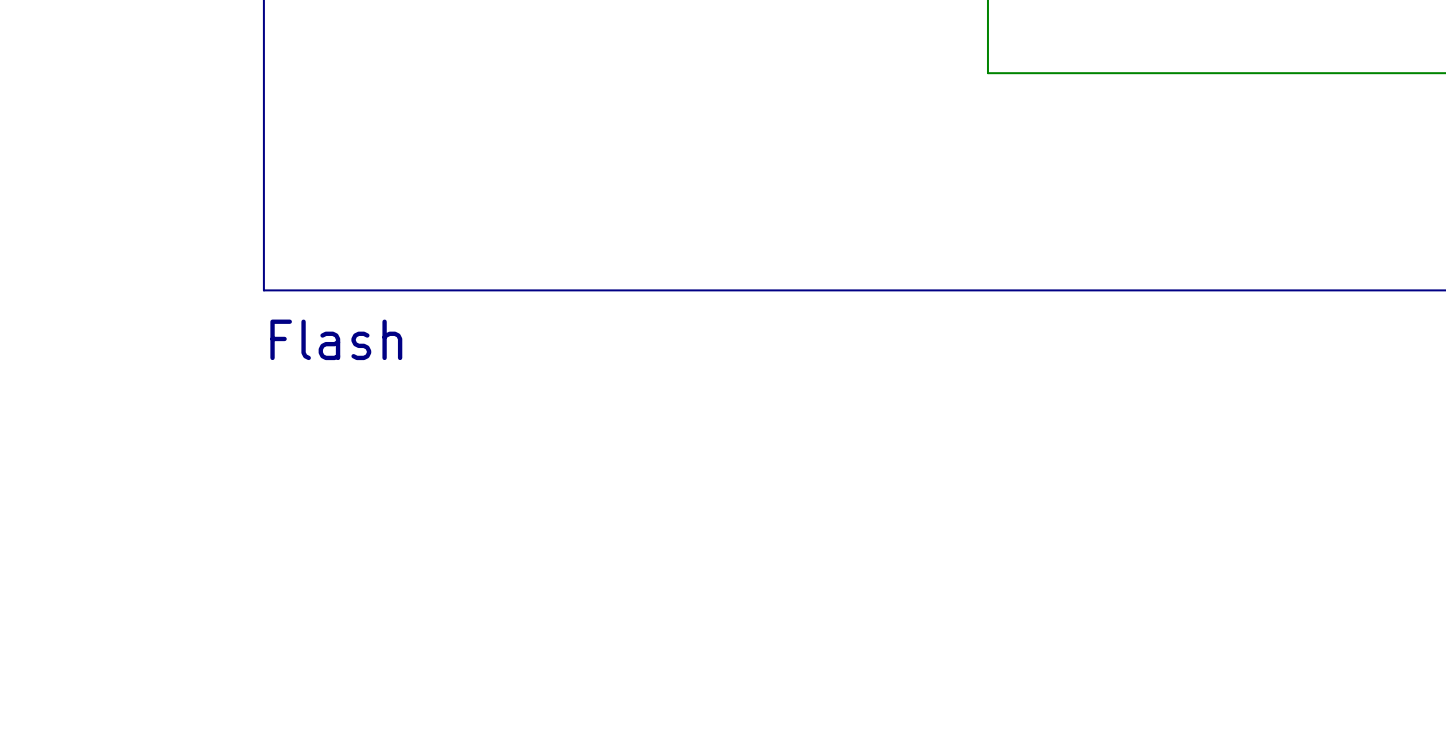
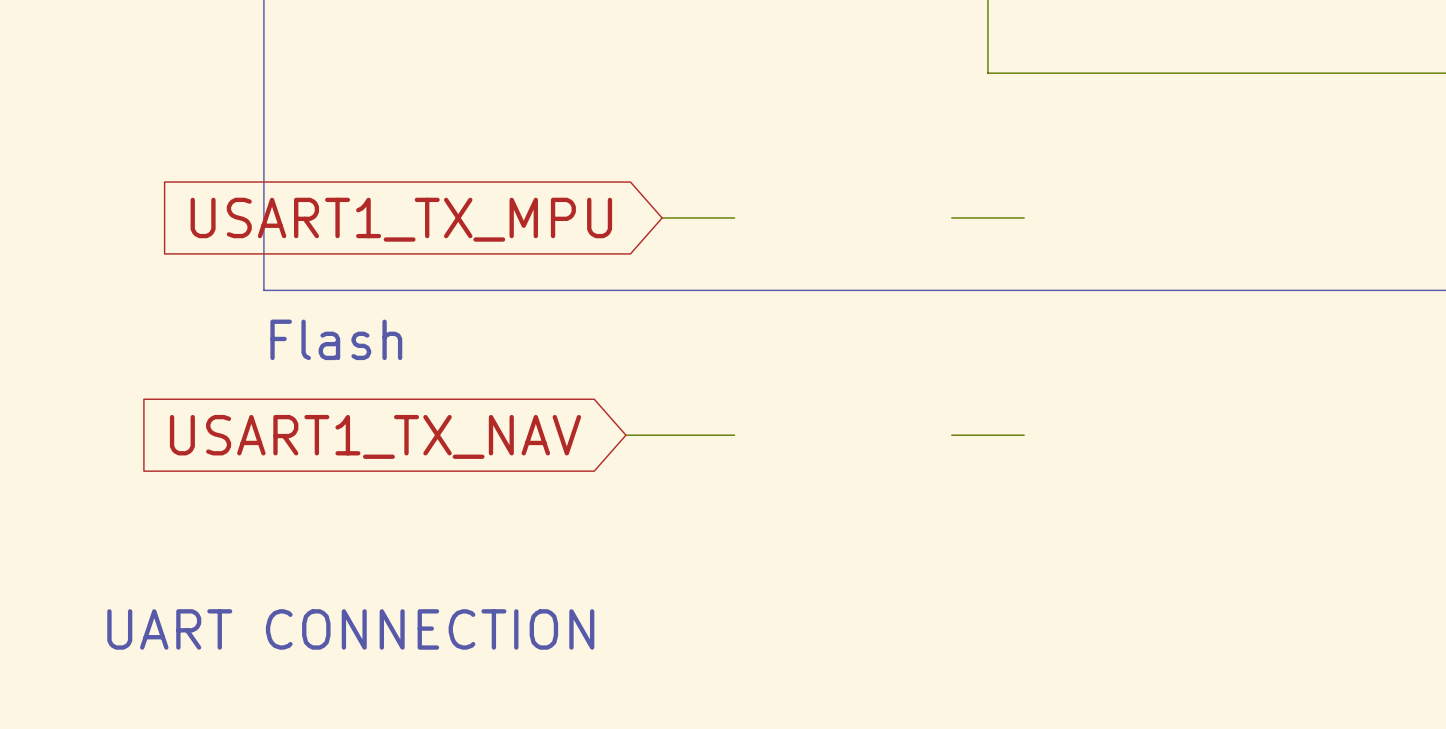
wire: none -> (662, 217) (734, 217)
wire: none -> (951, 217) (1024, 217)
global label: none -> USART1_TX_MPU (401, 219)
wire: none -> (625, 435) (734, 435)
wire: none -> (951, 435) (1024, 435)
global label: none -> USART1_TX_NAV (375, 436)
text: none -> UART CONNECTION (350, 629)

